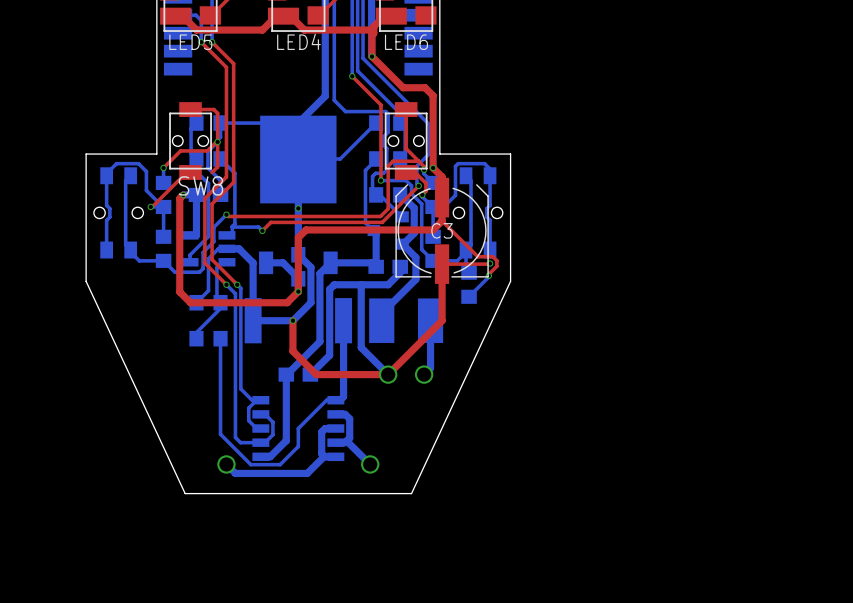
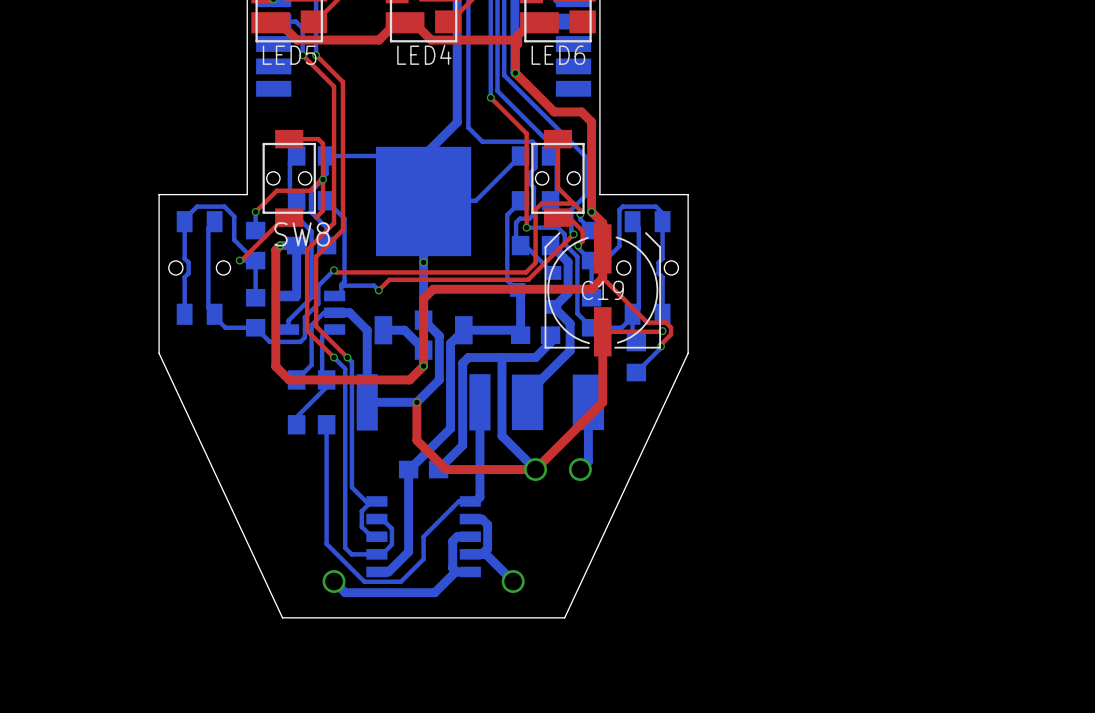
C3 name: C3 (442, 230) -> C19 (602, 290)

